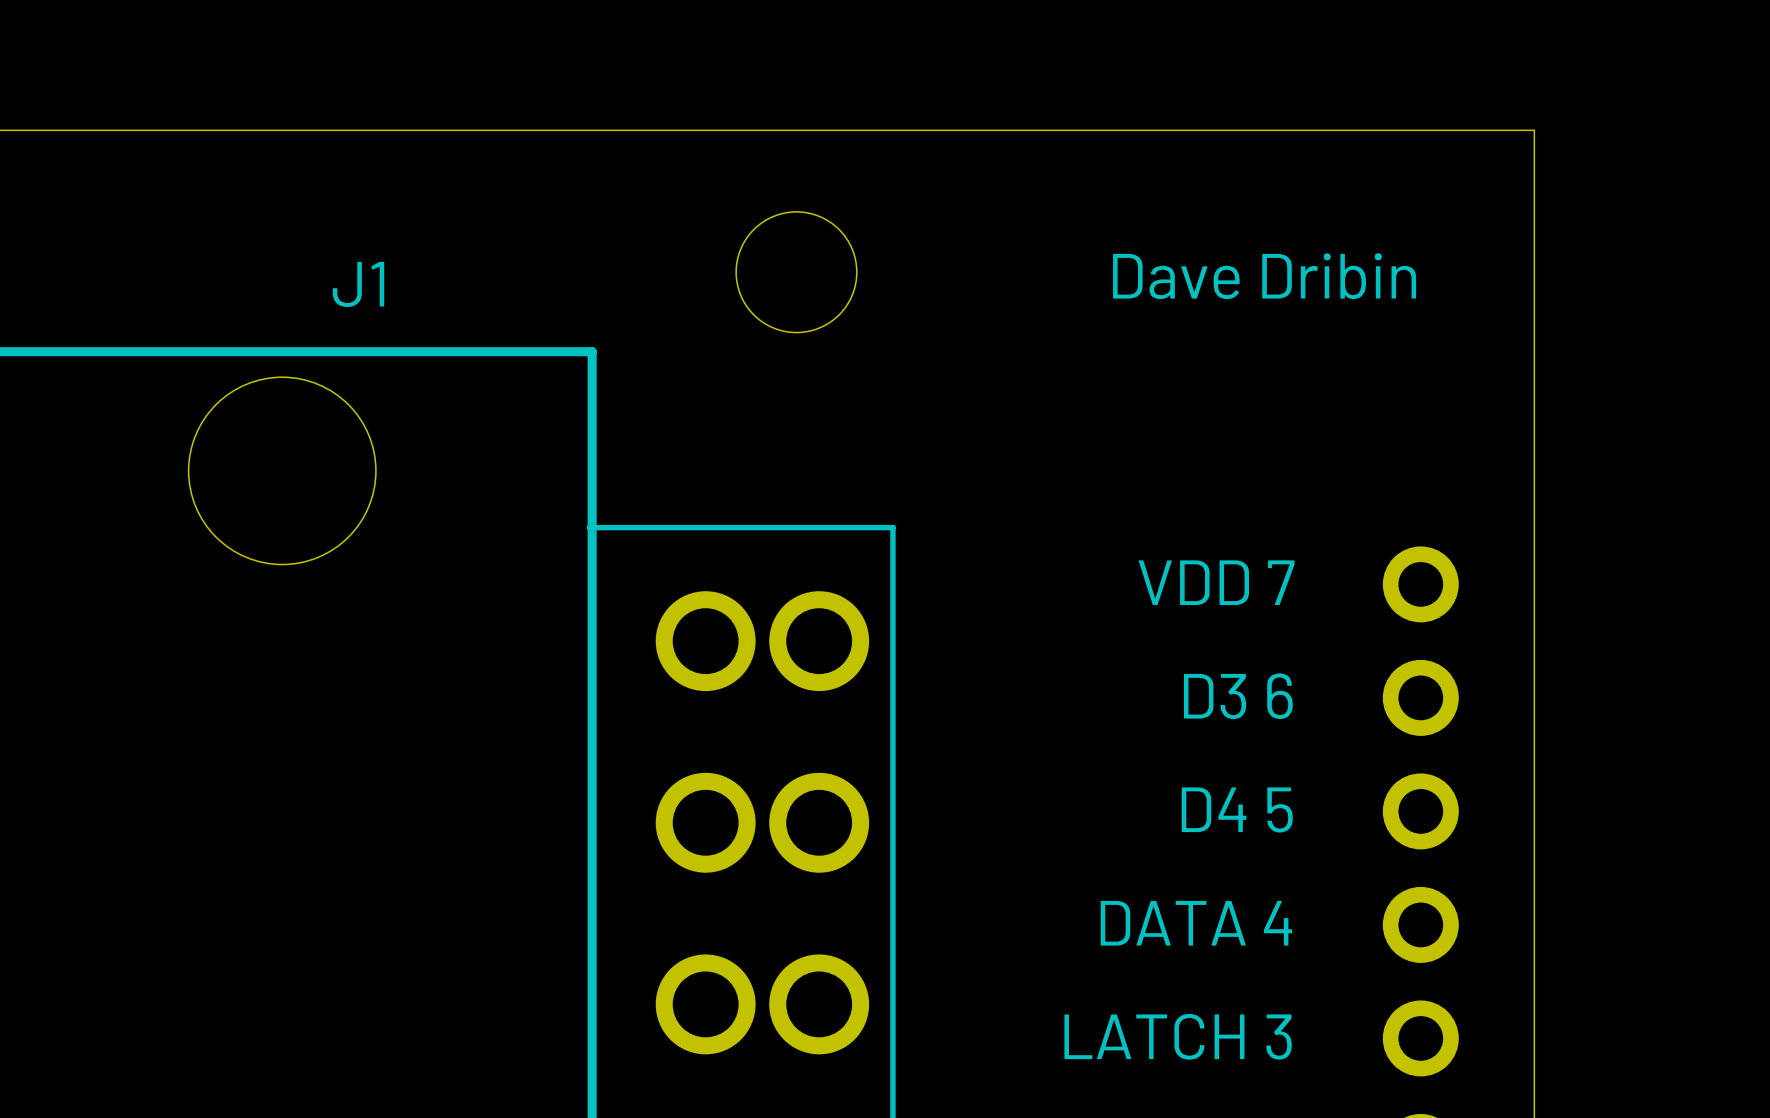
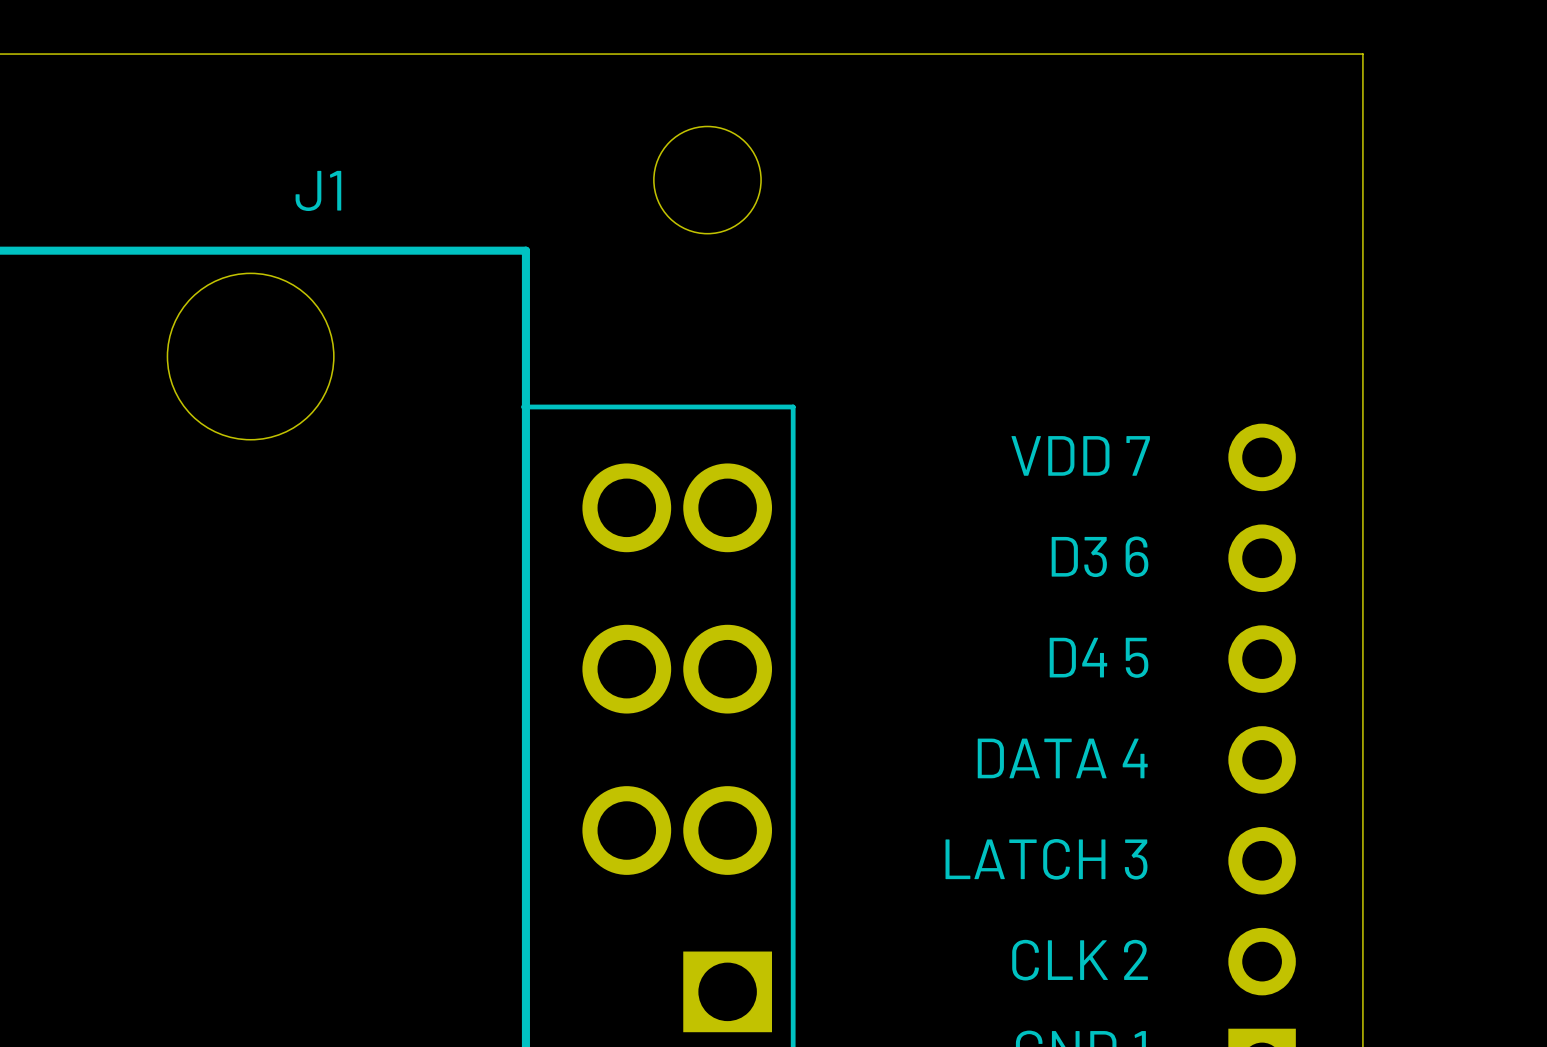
text: Dave Dribin (1264, 276) -> none

